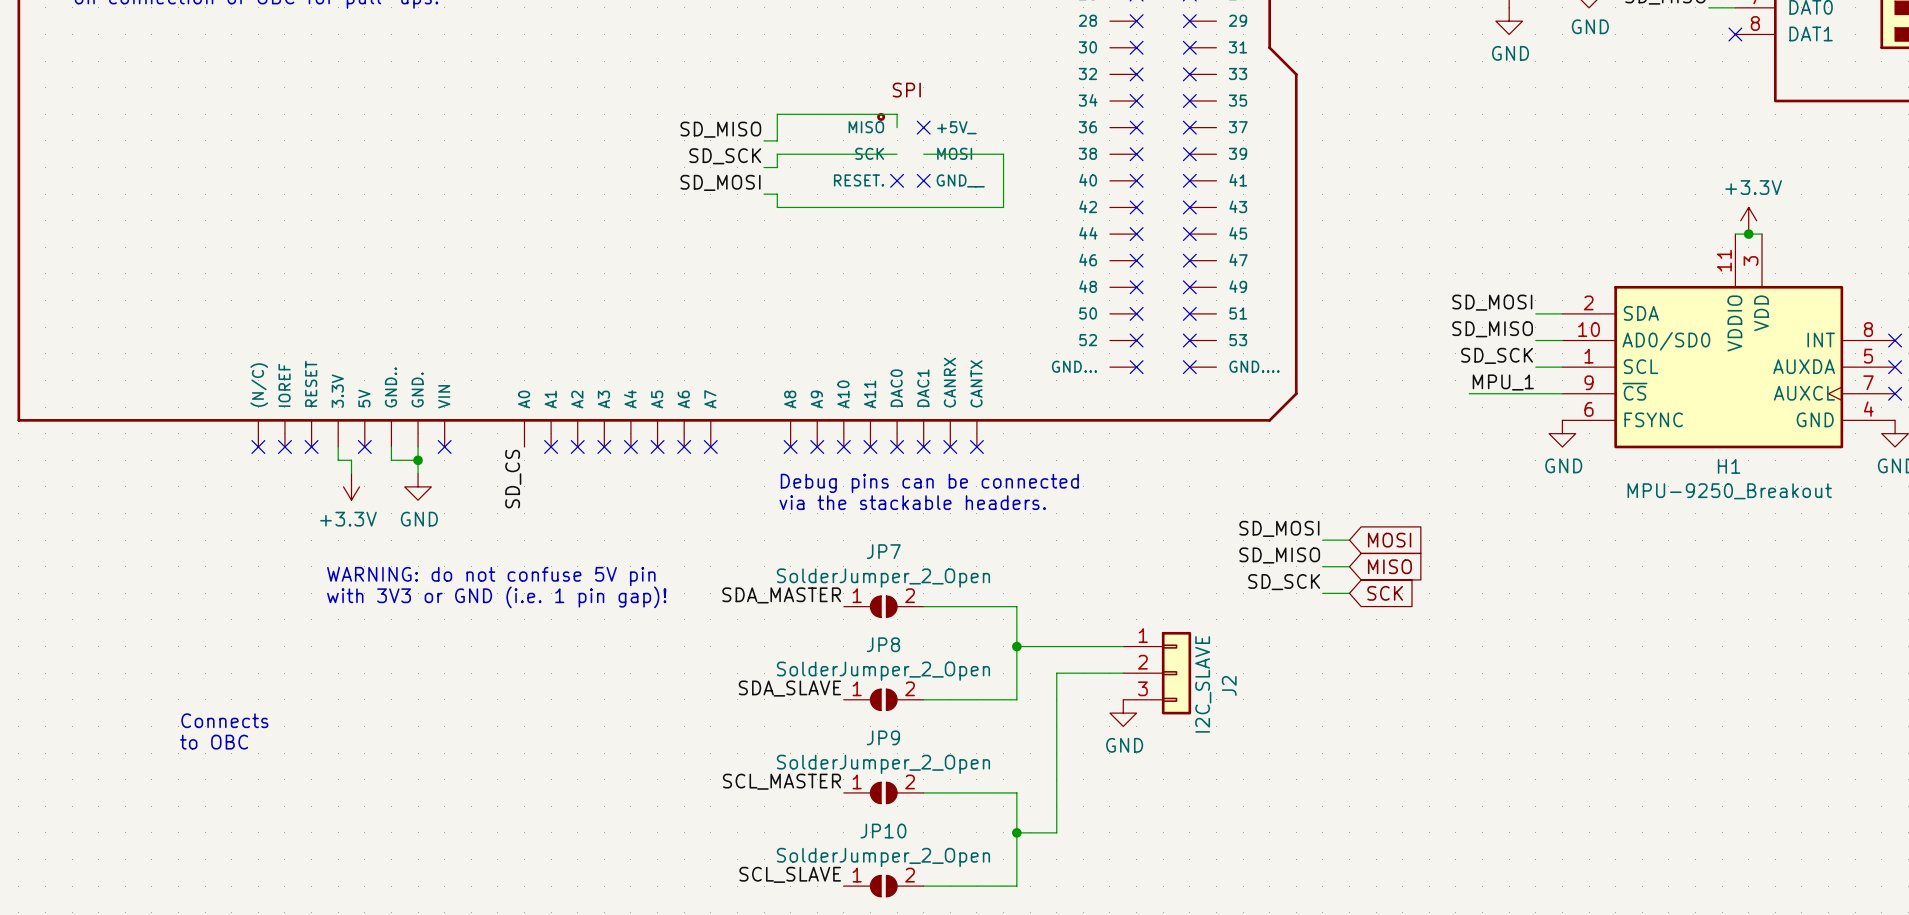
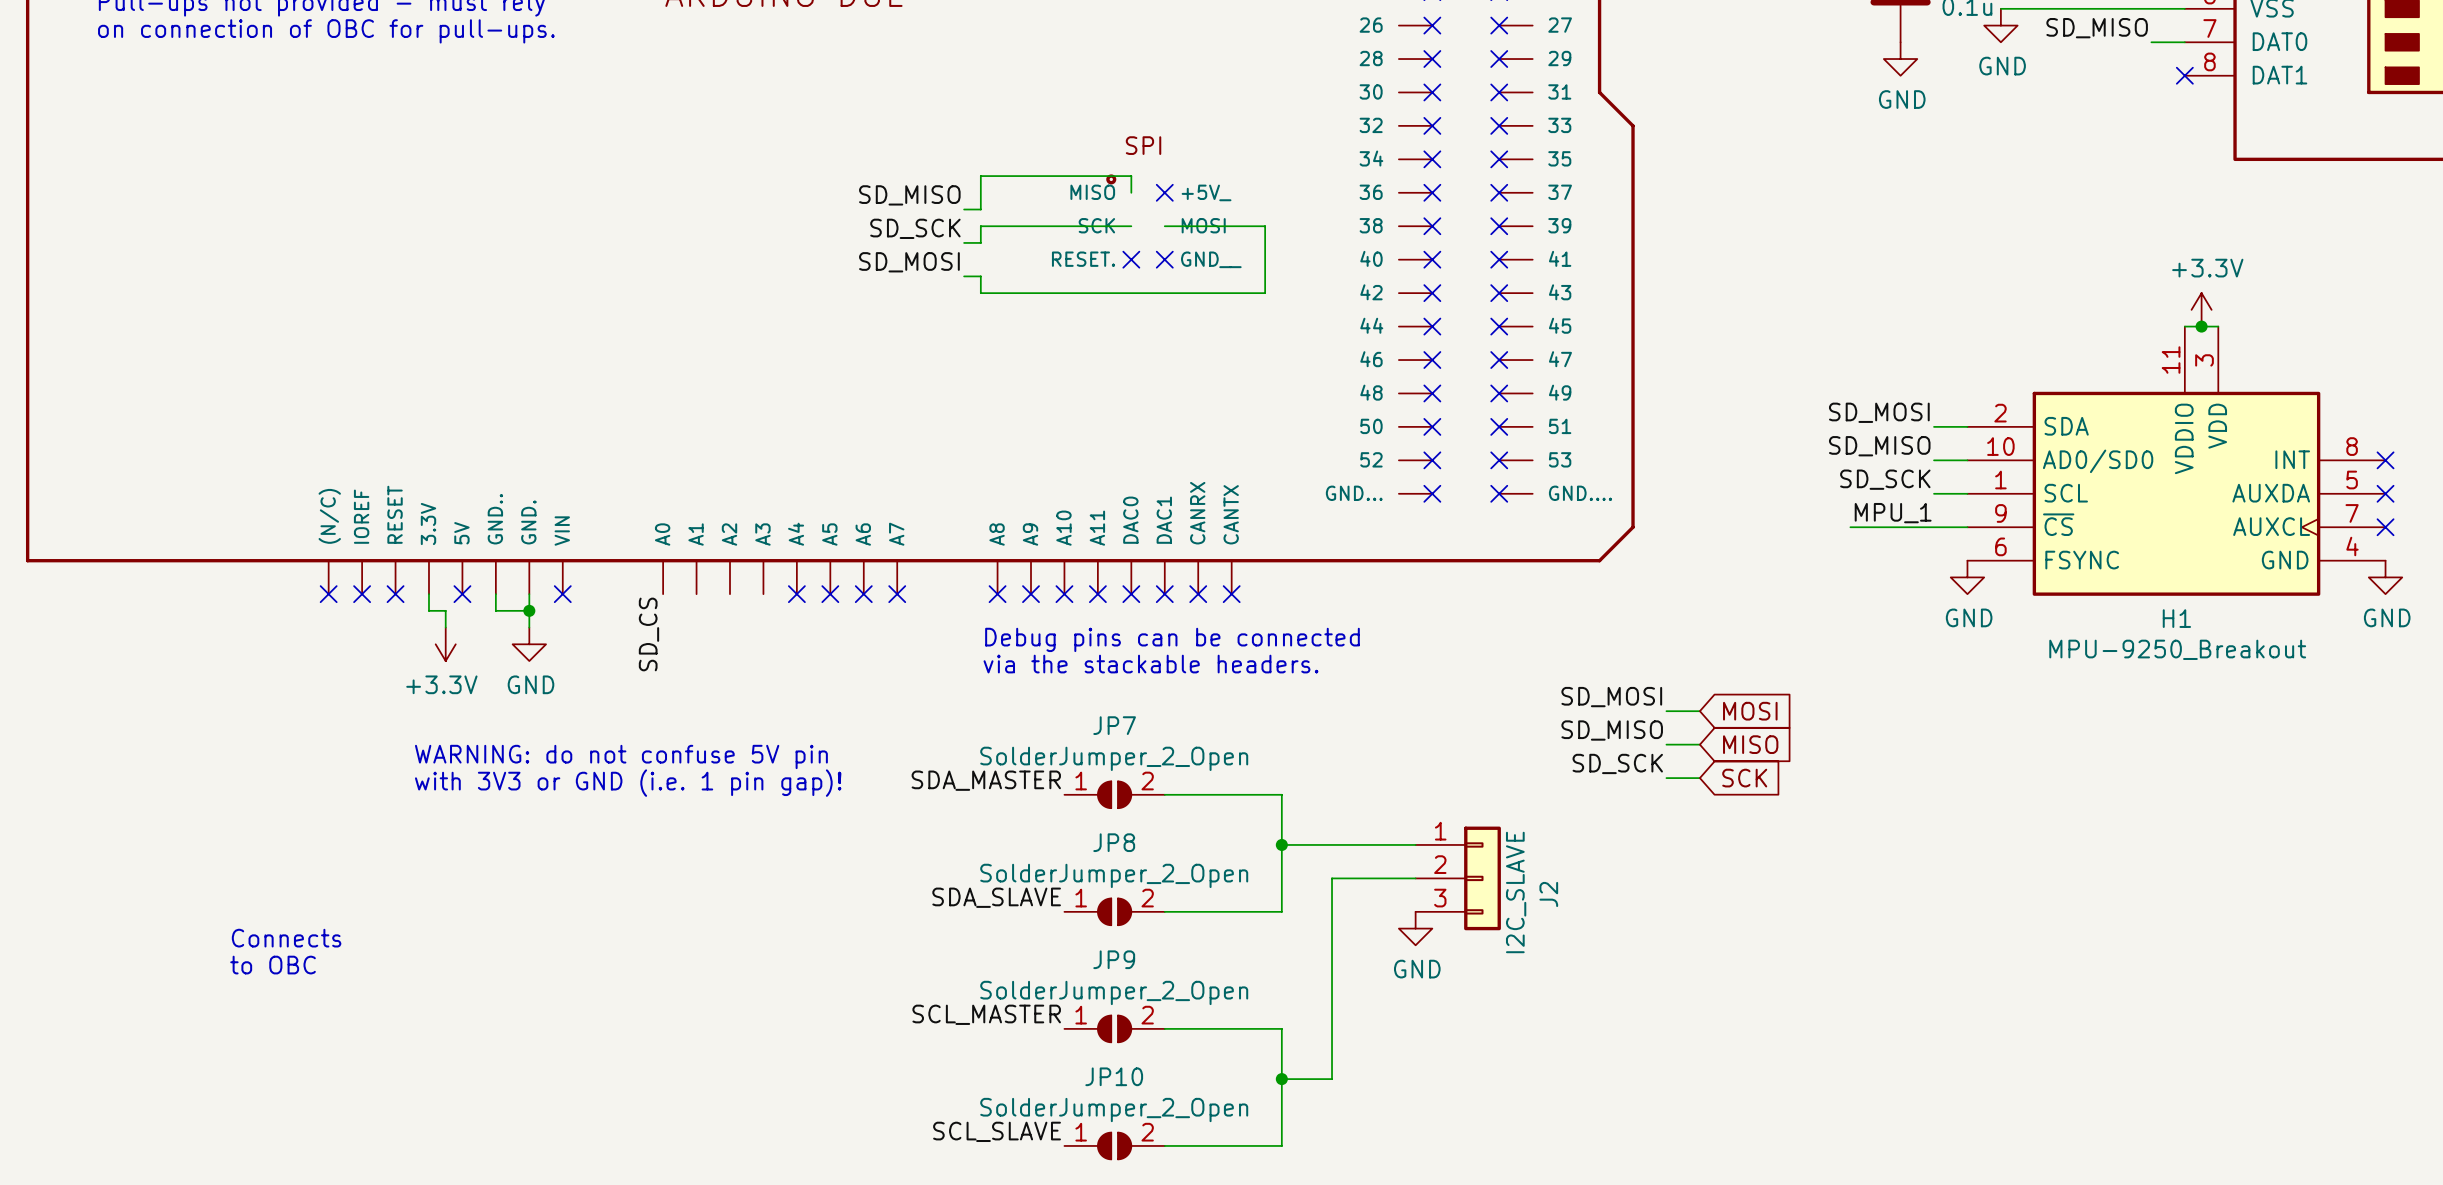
no-connect mark: (551, 446) -> none
no-connect mark: (577, 446) -> none
no-connect mark: (604, 446) -> none

